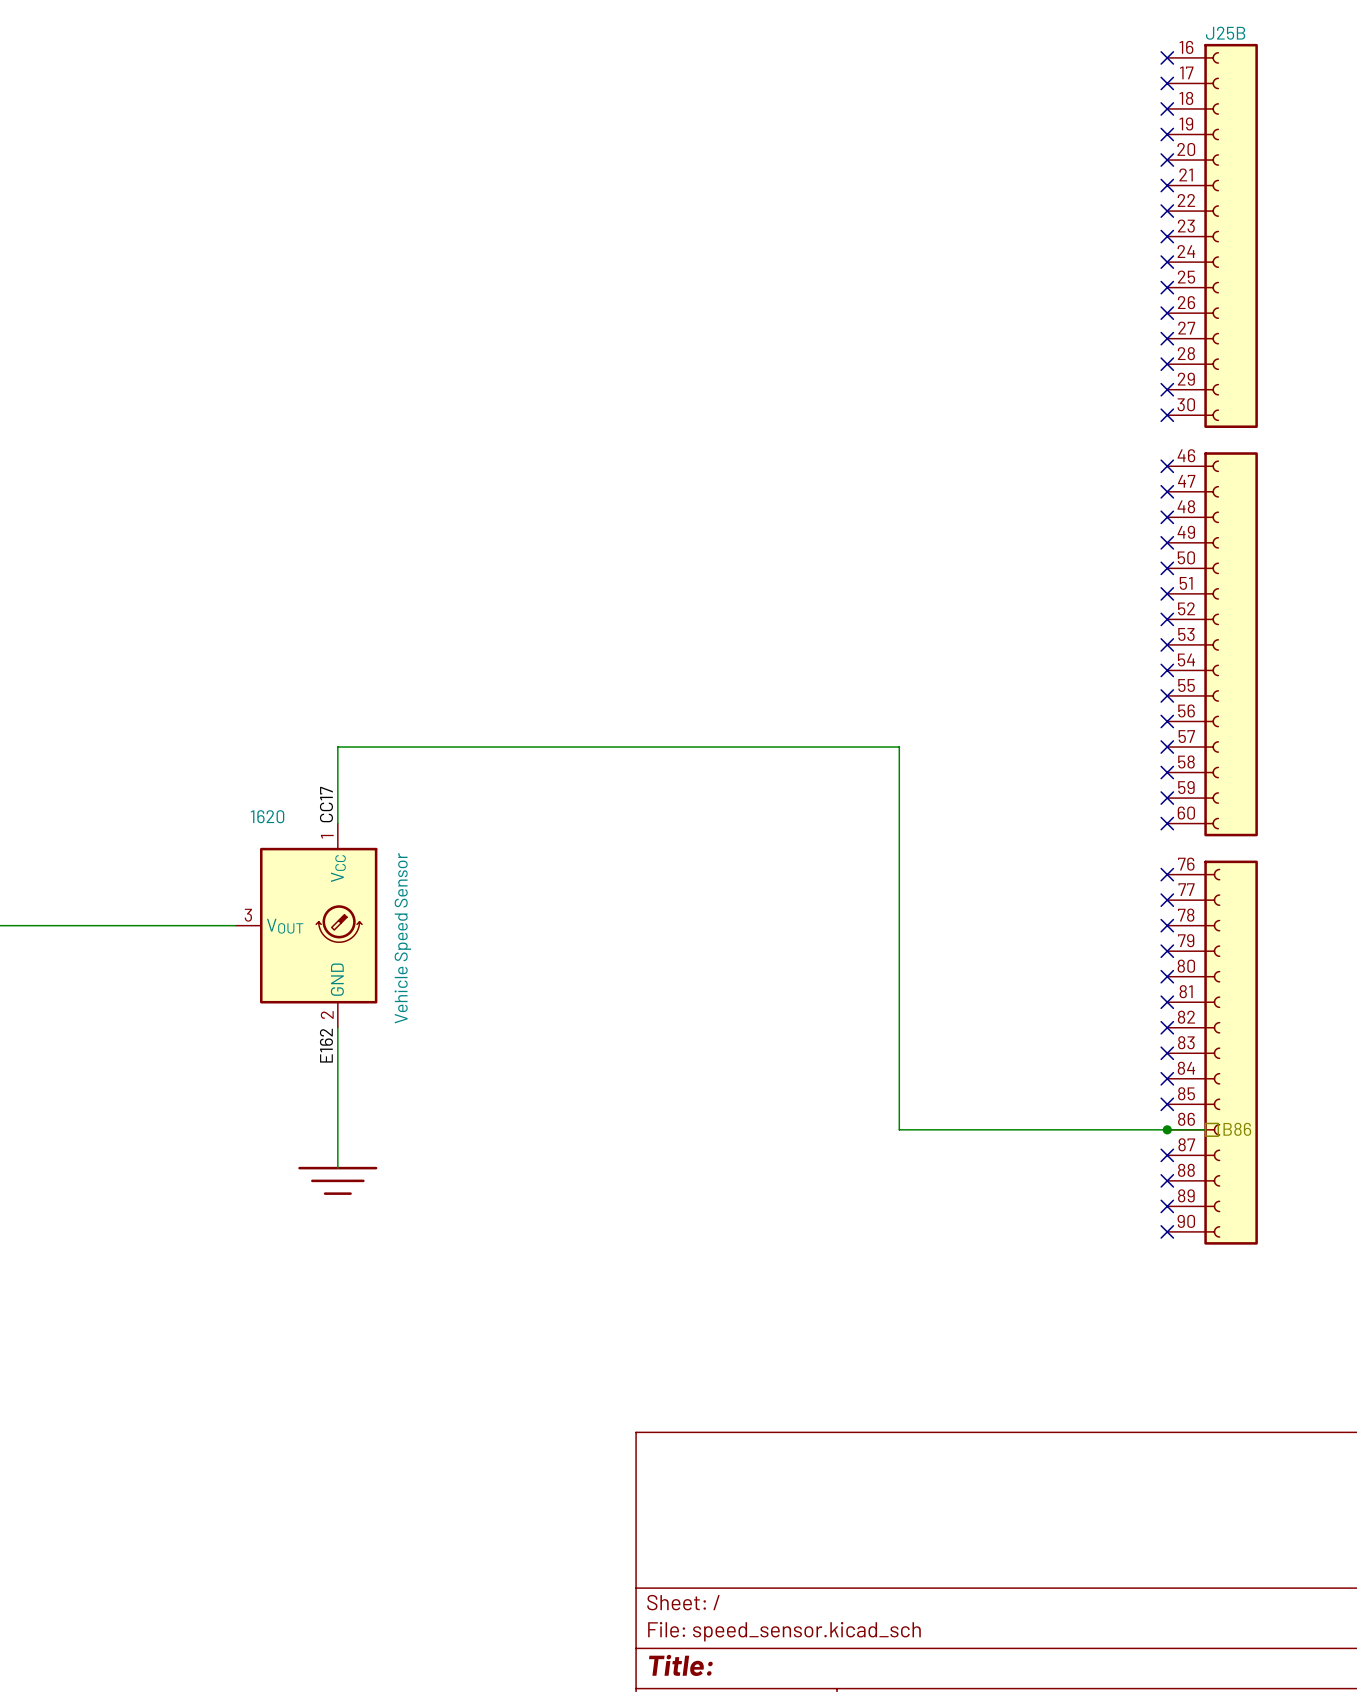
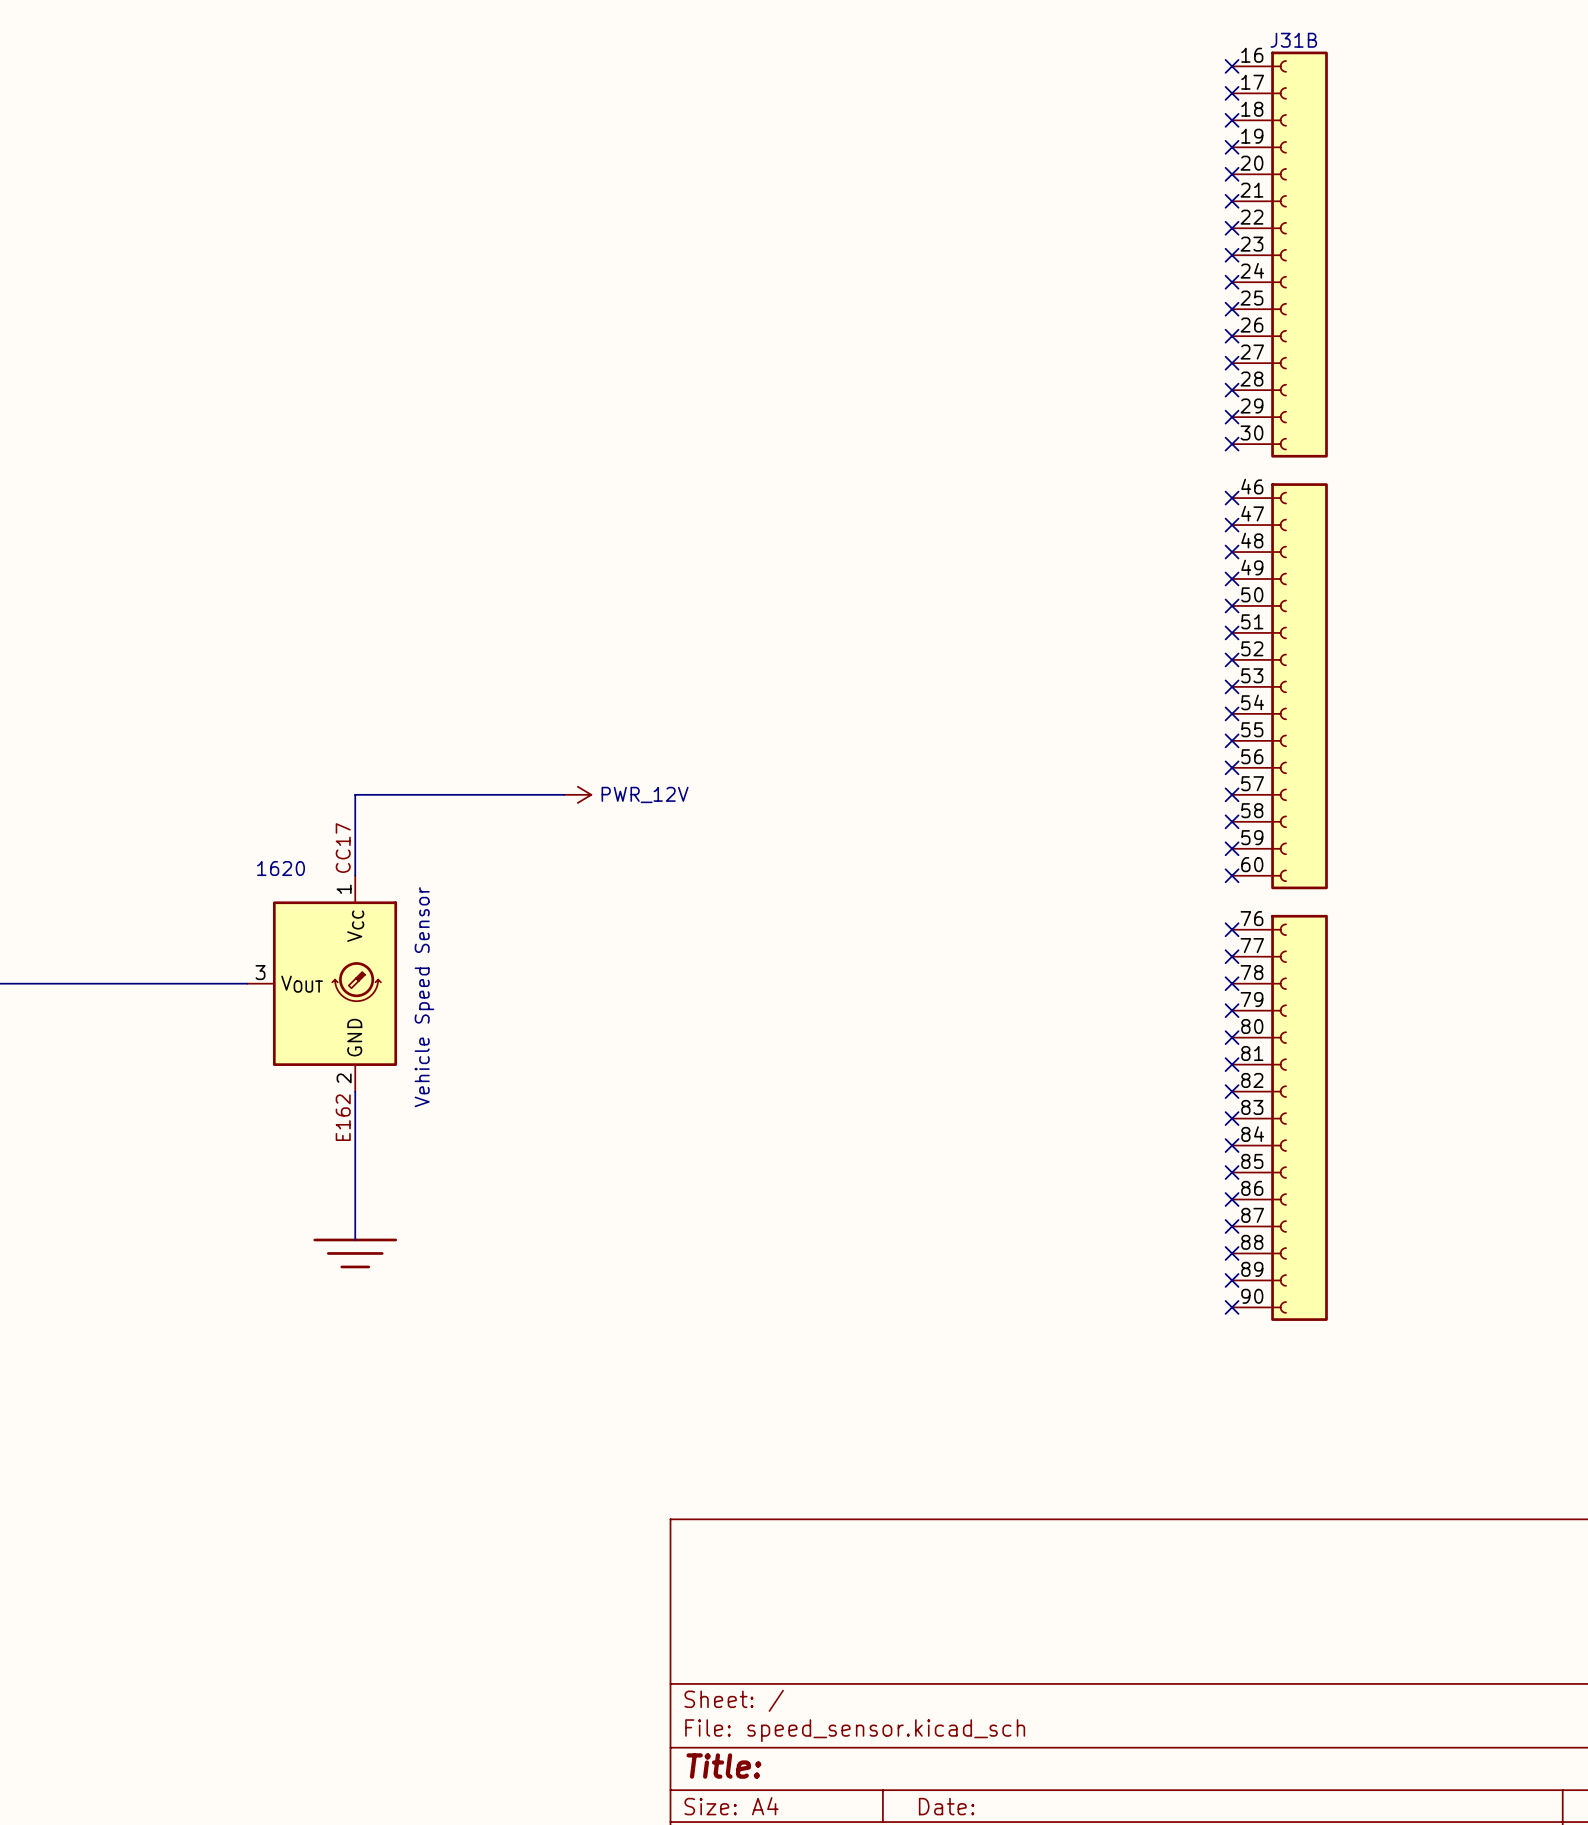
J25B: (1212, 644) -> none
J31B: none -> (1279, 686)
wire: (535, 747) (899, 747) (899, 1129) (1205, 1129) -> none
power symbol: none -> PWR_12V (577, 794)
junction: (1167, 1129) -> none
no-connect mark: none -> (1232, 1199)
hierarchical label: B86 (1237, 1129) -> none

